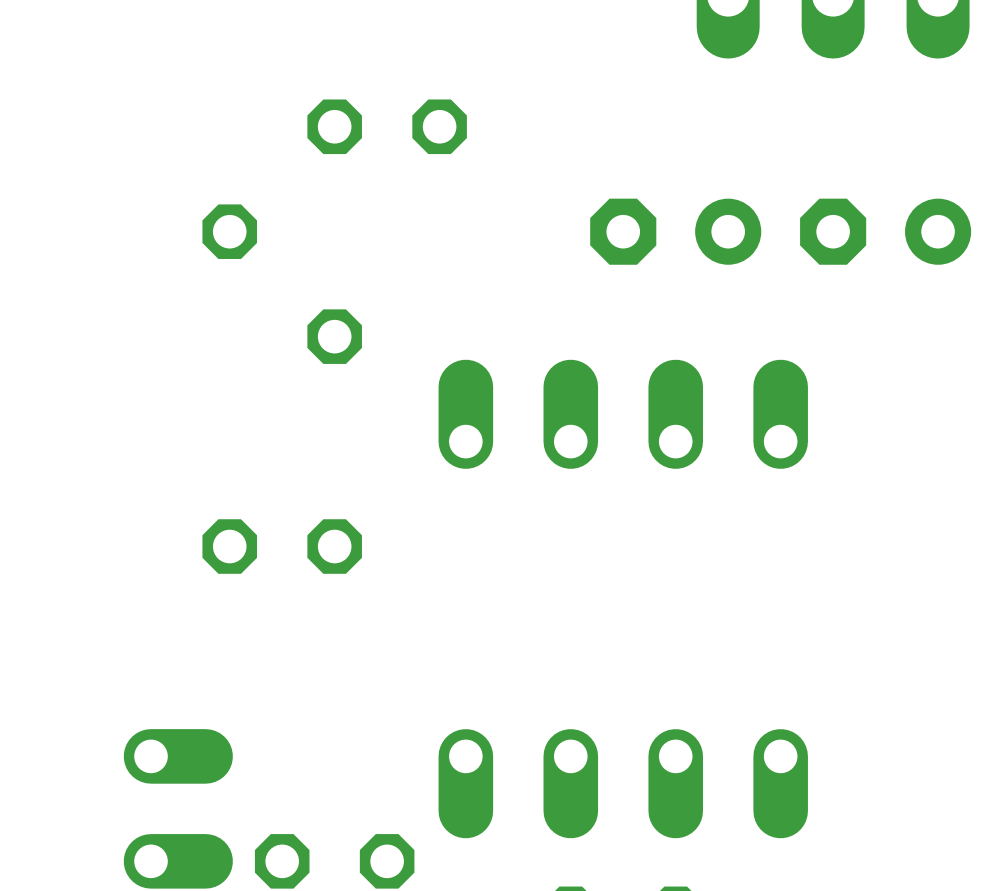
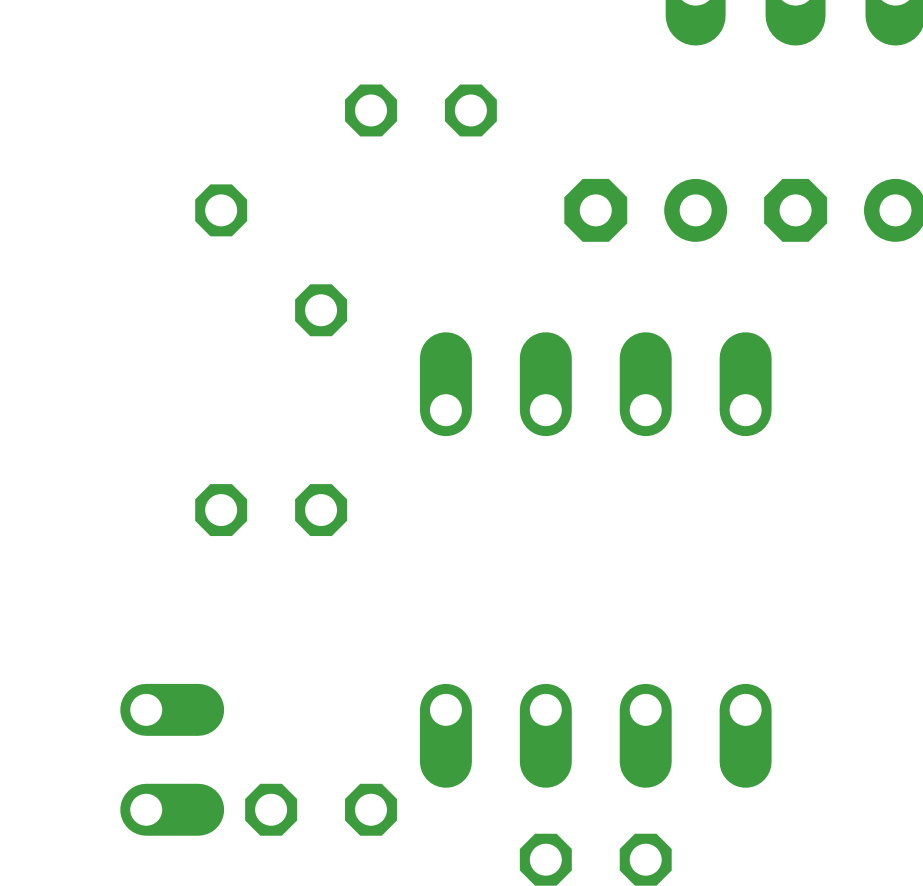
part position: (387, 126) -> (420, 110)

